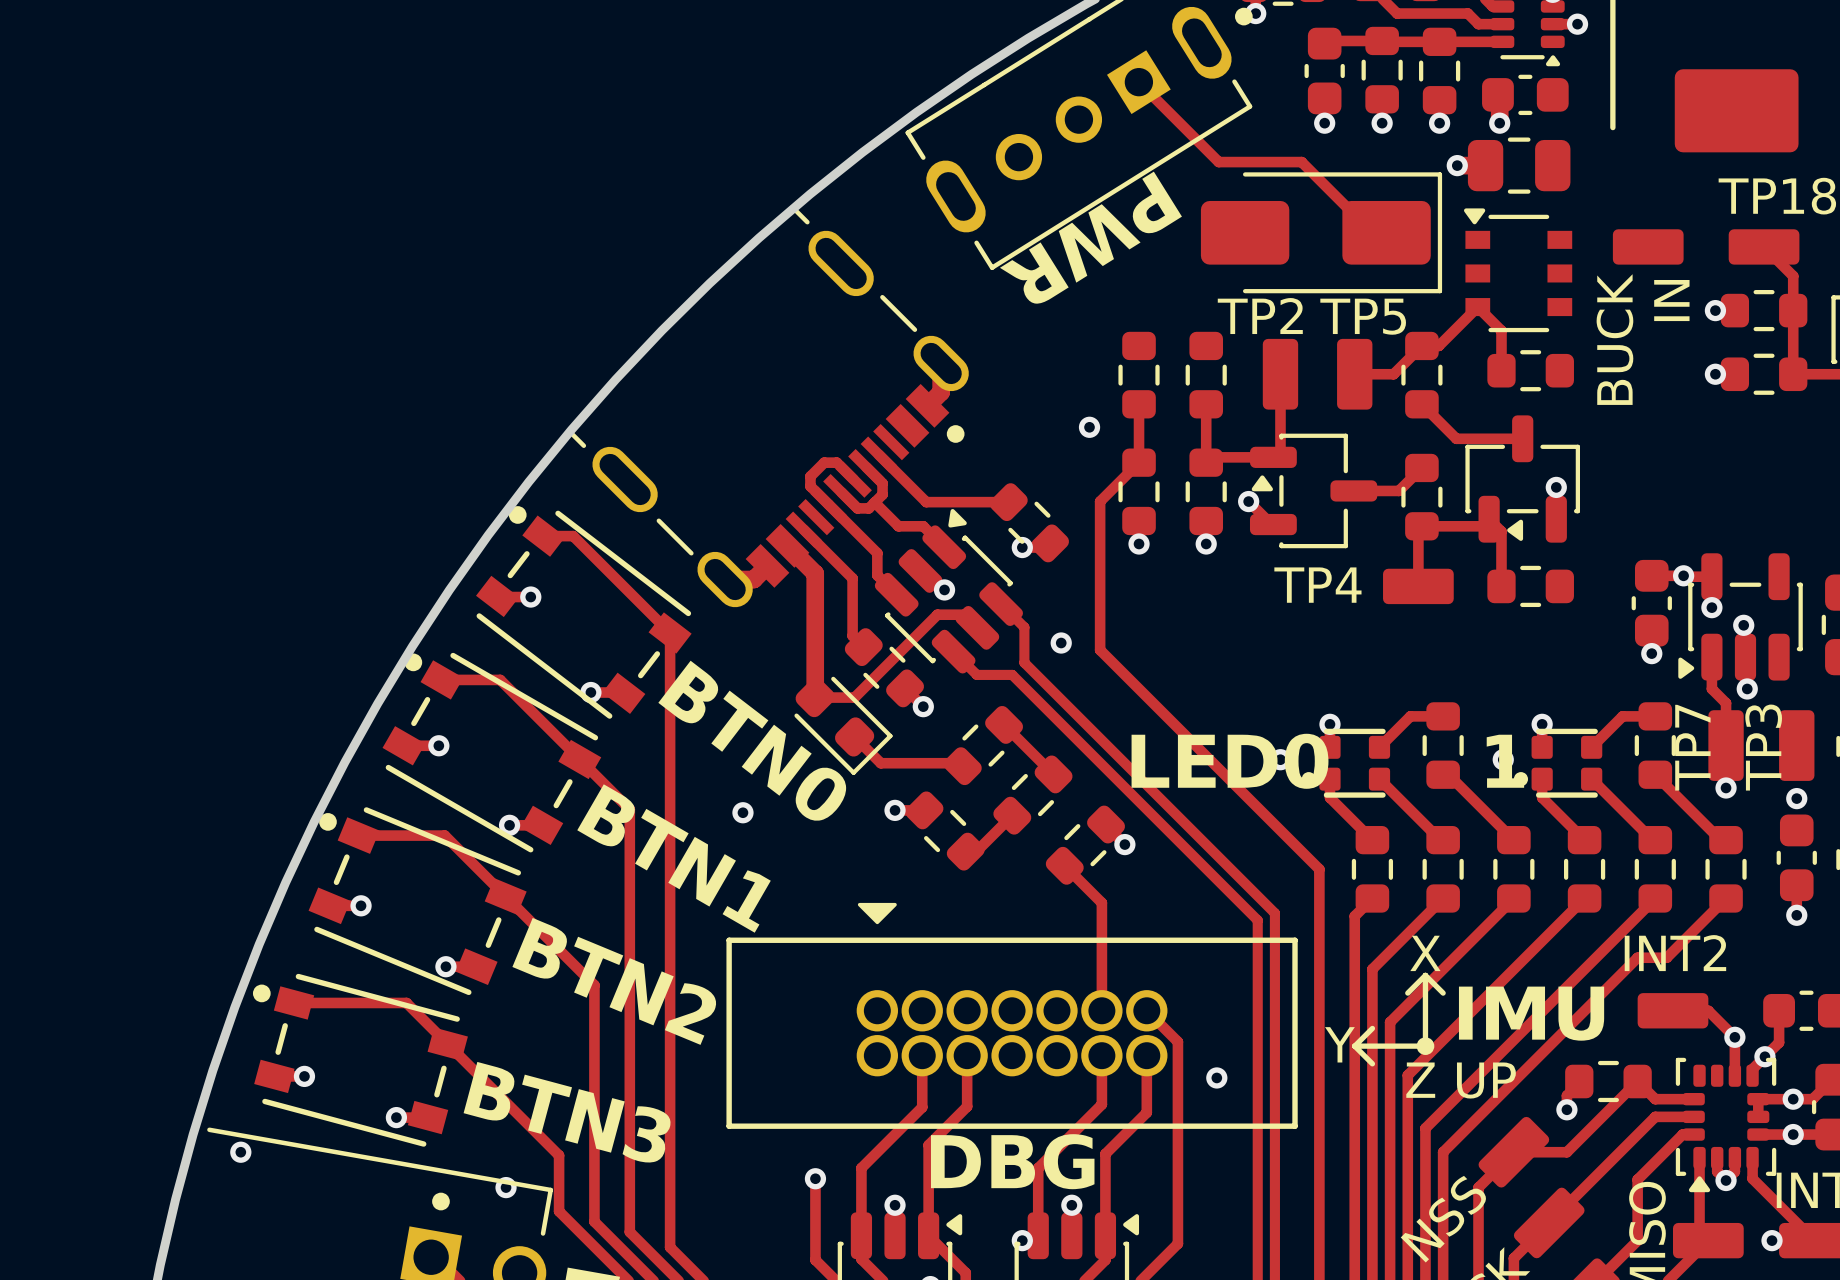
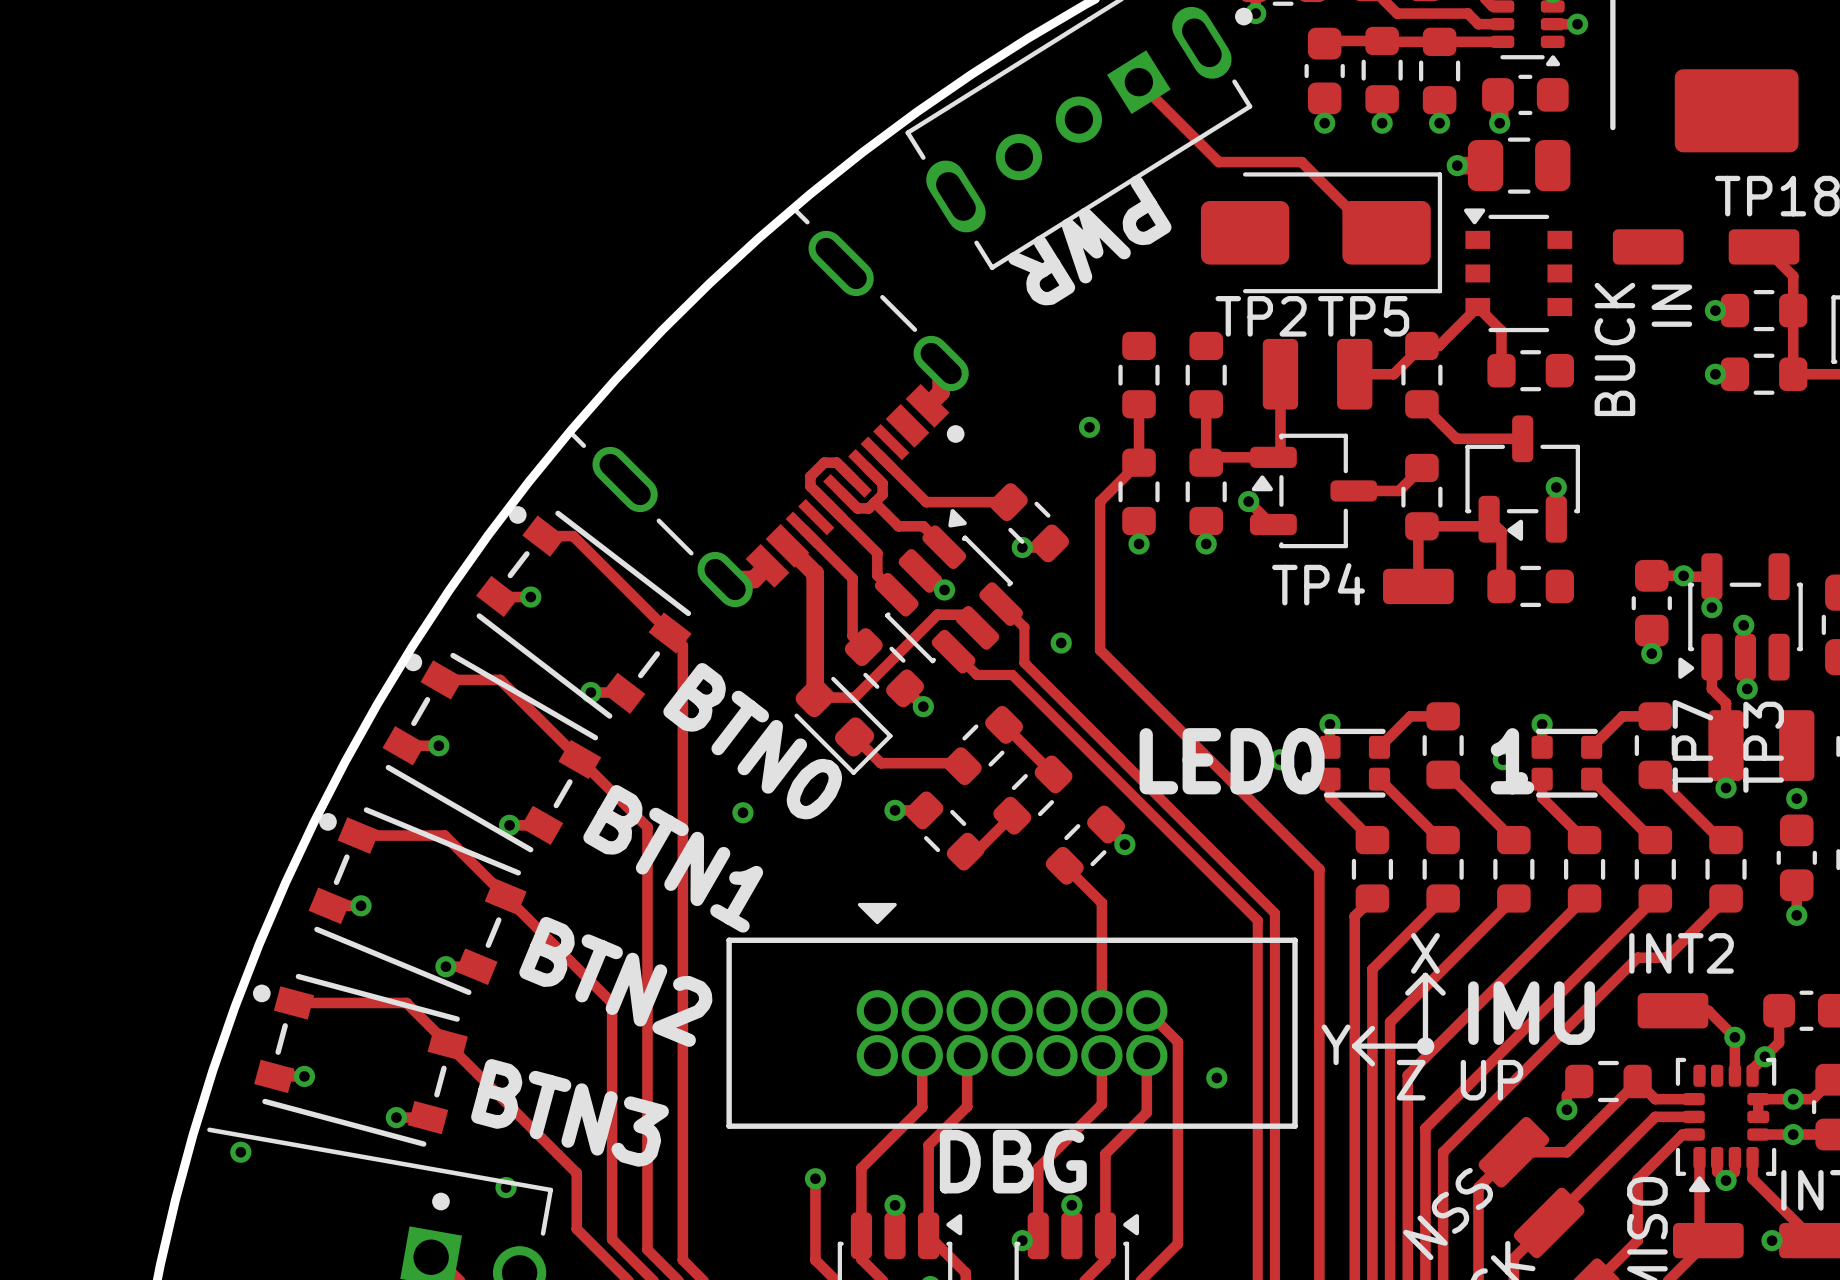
track: (670, 632) (670, 1247) (682, 1260) -> (670, 632) (682, 645) (682, 1260)
track: (629, 809) (629, 1232) (647, 1249) -> (629, 809) (647, 827) (647, 1249)
track: (594, 985) (594, 1221) (612, 1239) -> (594, 985) (612, 1002) (612, 1239)
track: (559, 1155) (559, 1211) (576, 1229) -> (559, 1155) (576, 1173) (576, 1229)

